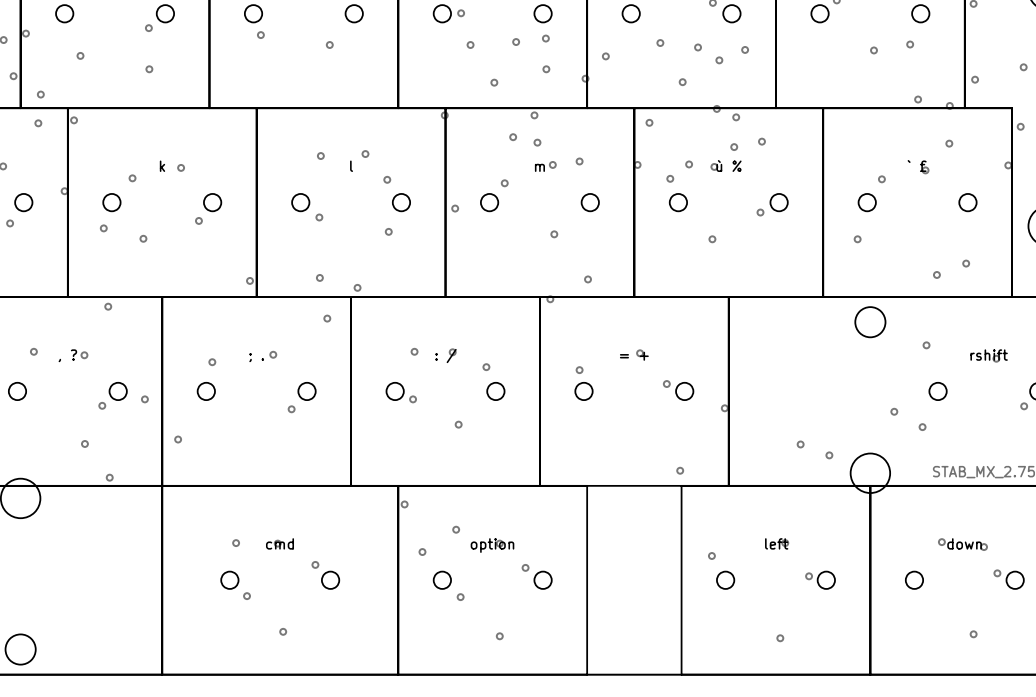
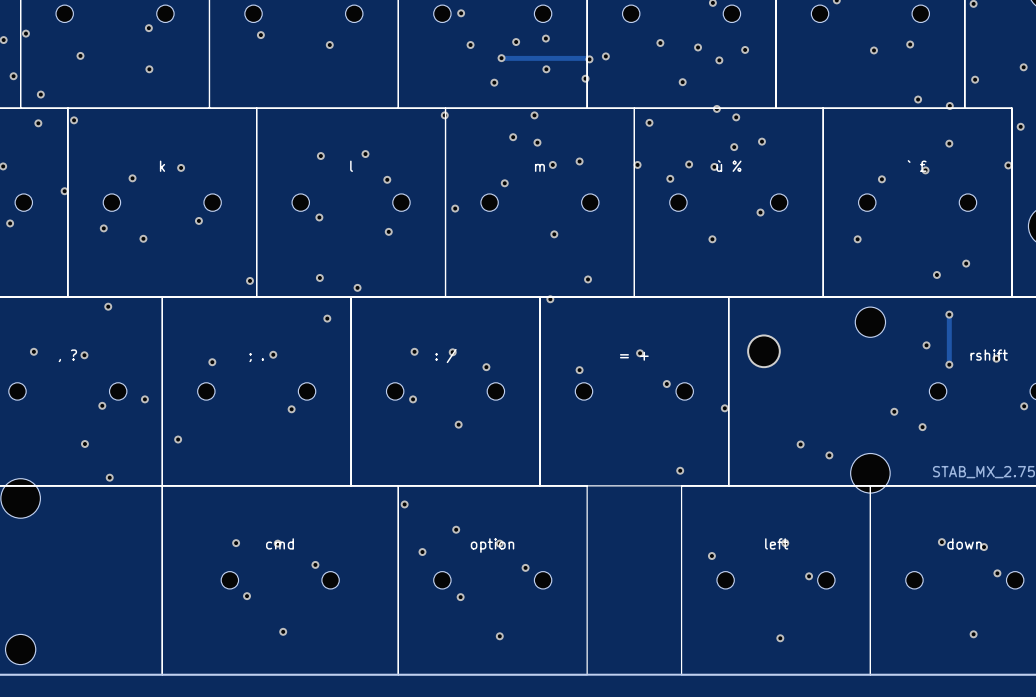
track: none -> (501, 58) (589, 59)
via: none -> (501, 58)
via: none -> (589, 59)
track: none -> (949, 314) (949, 364)
via: none -> (949, 314)
part: none -> (763, 351)
via: none -> (949, 364)

